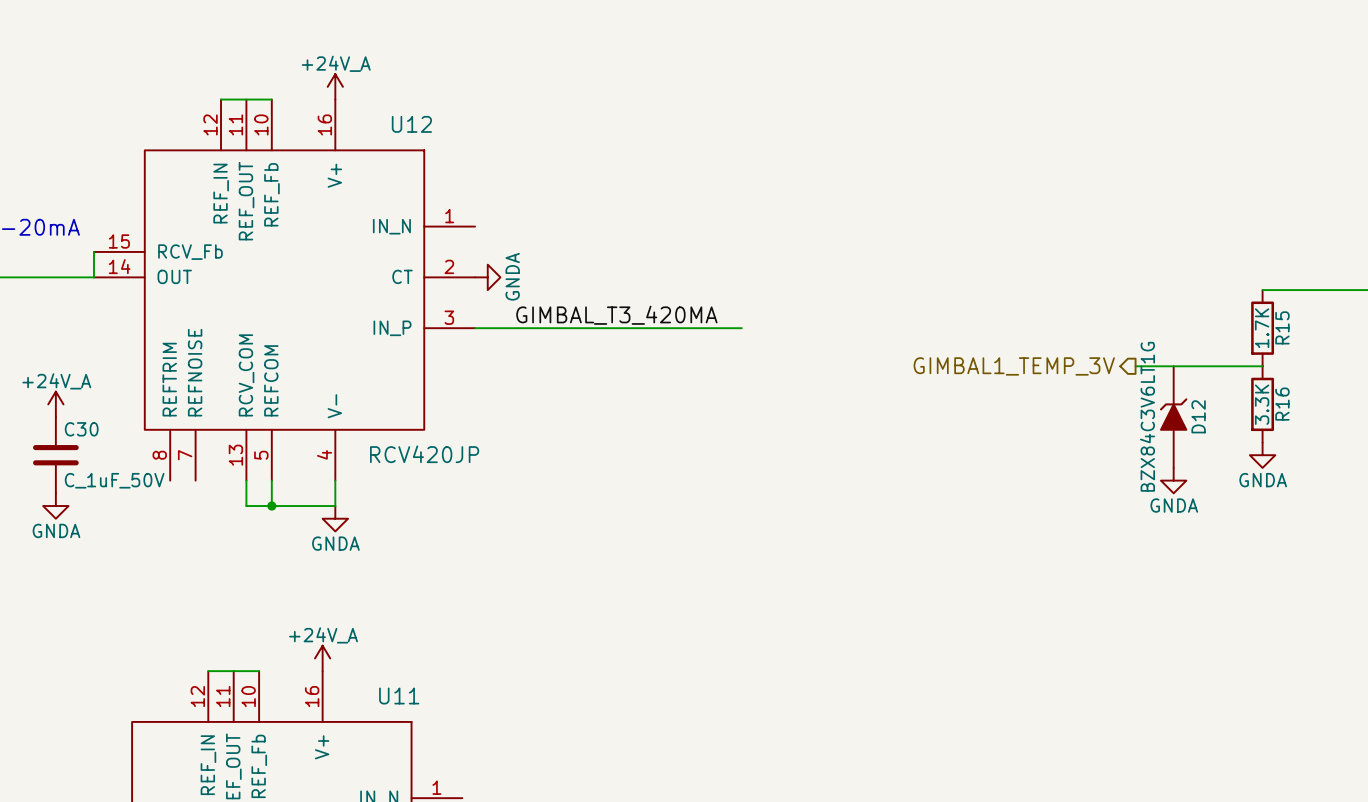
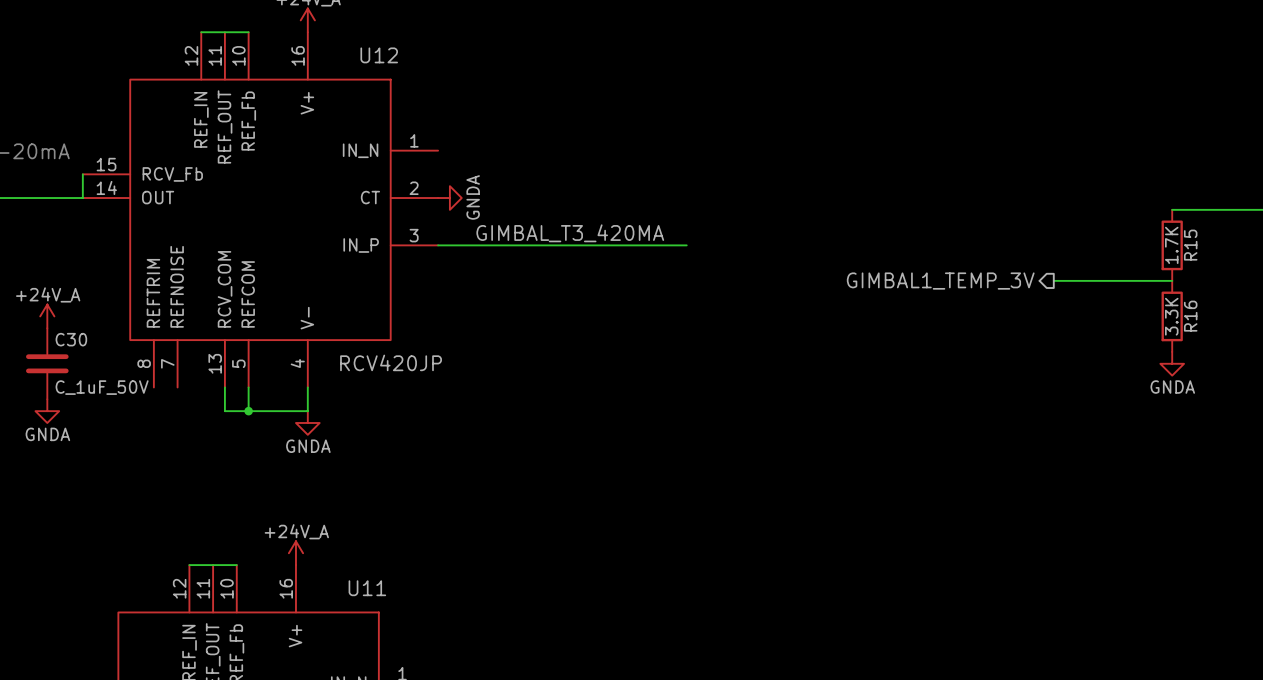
D12: BZX84C3V6LT1G (1173, 417) -> none
power symbol: GNDA (1173, 480) -> none

